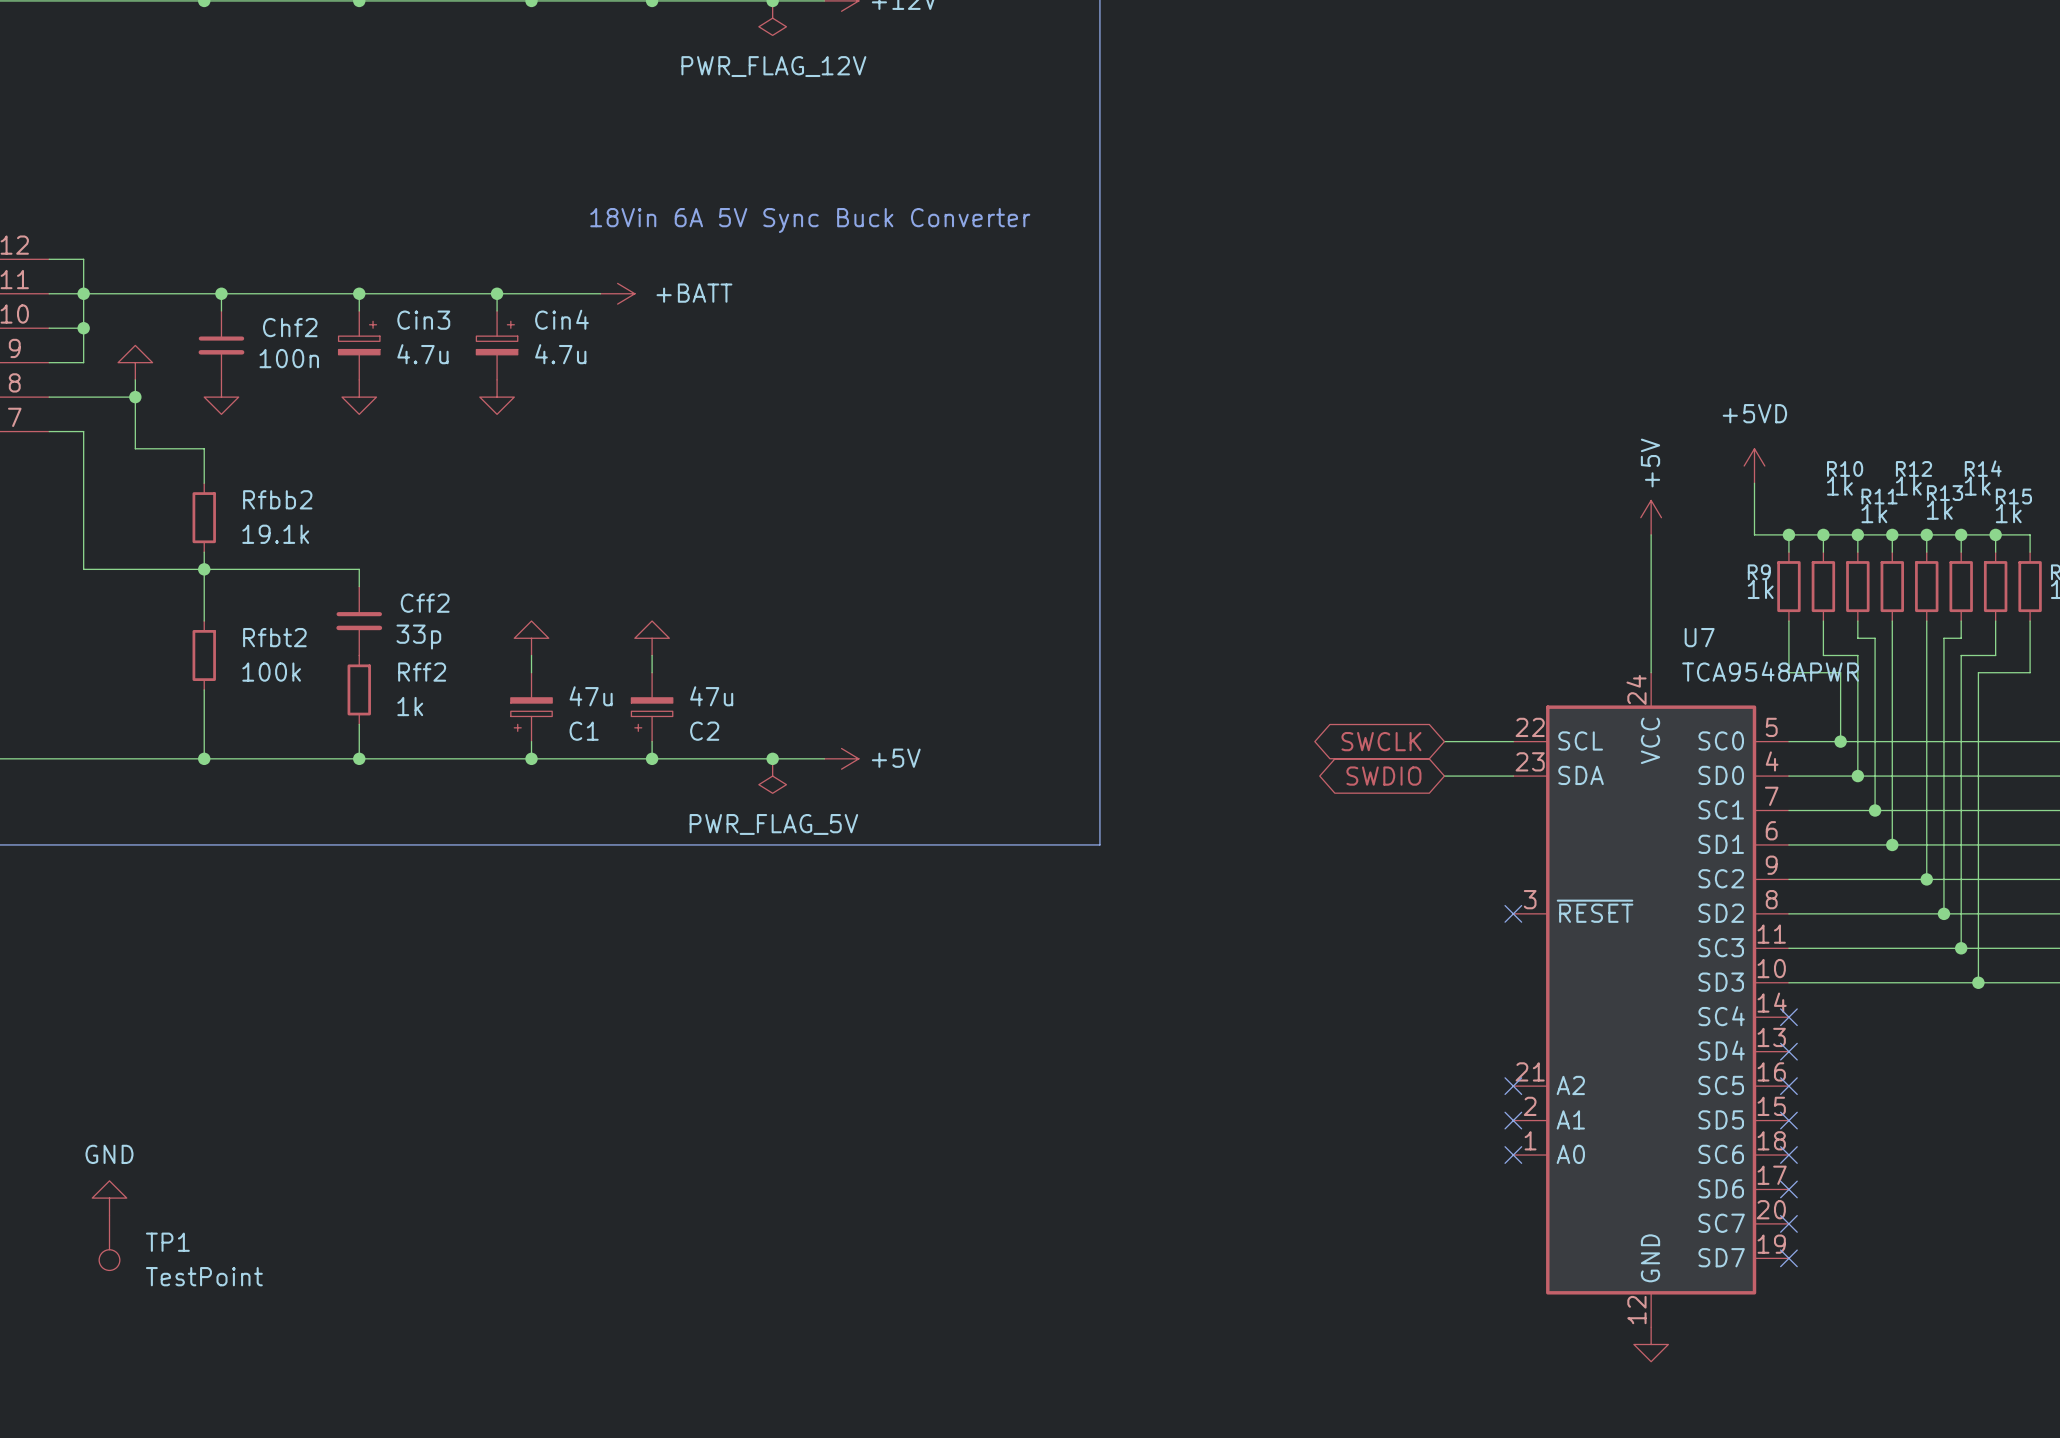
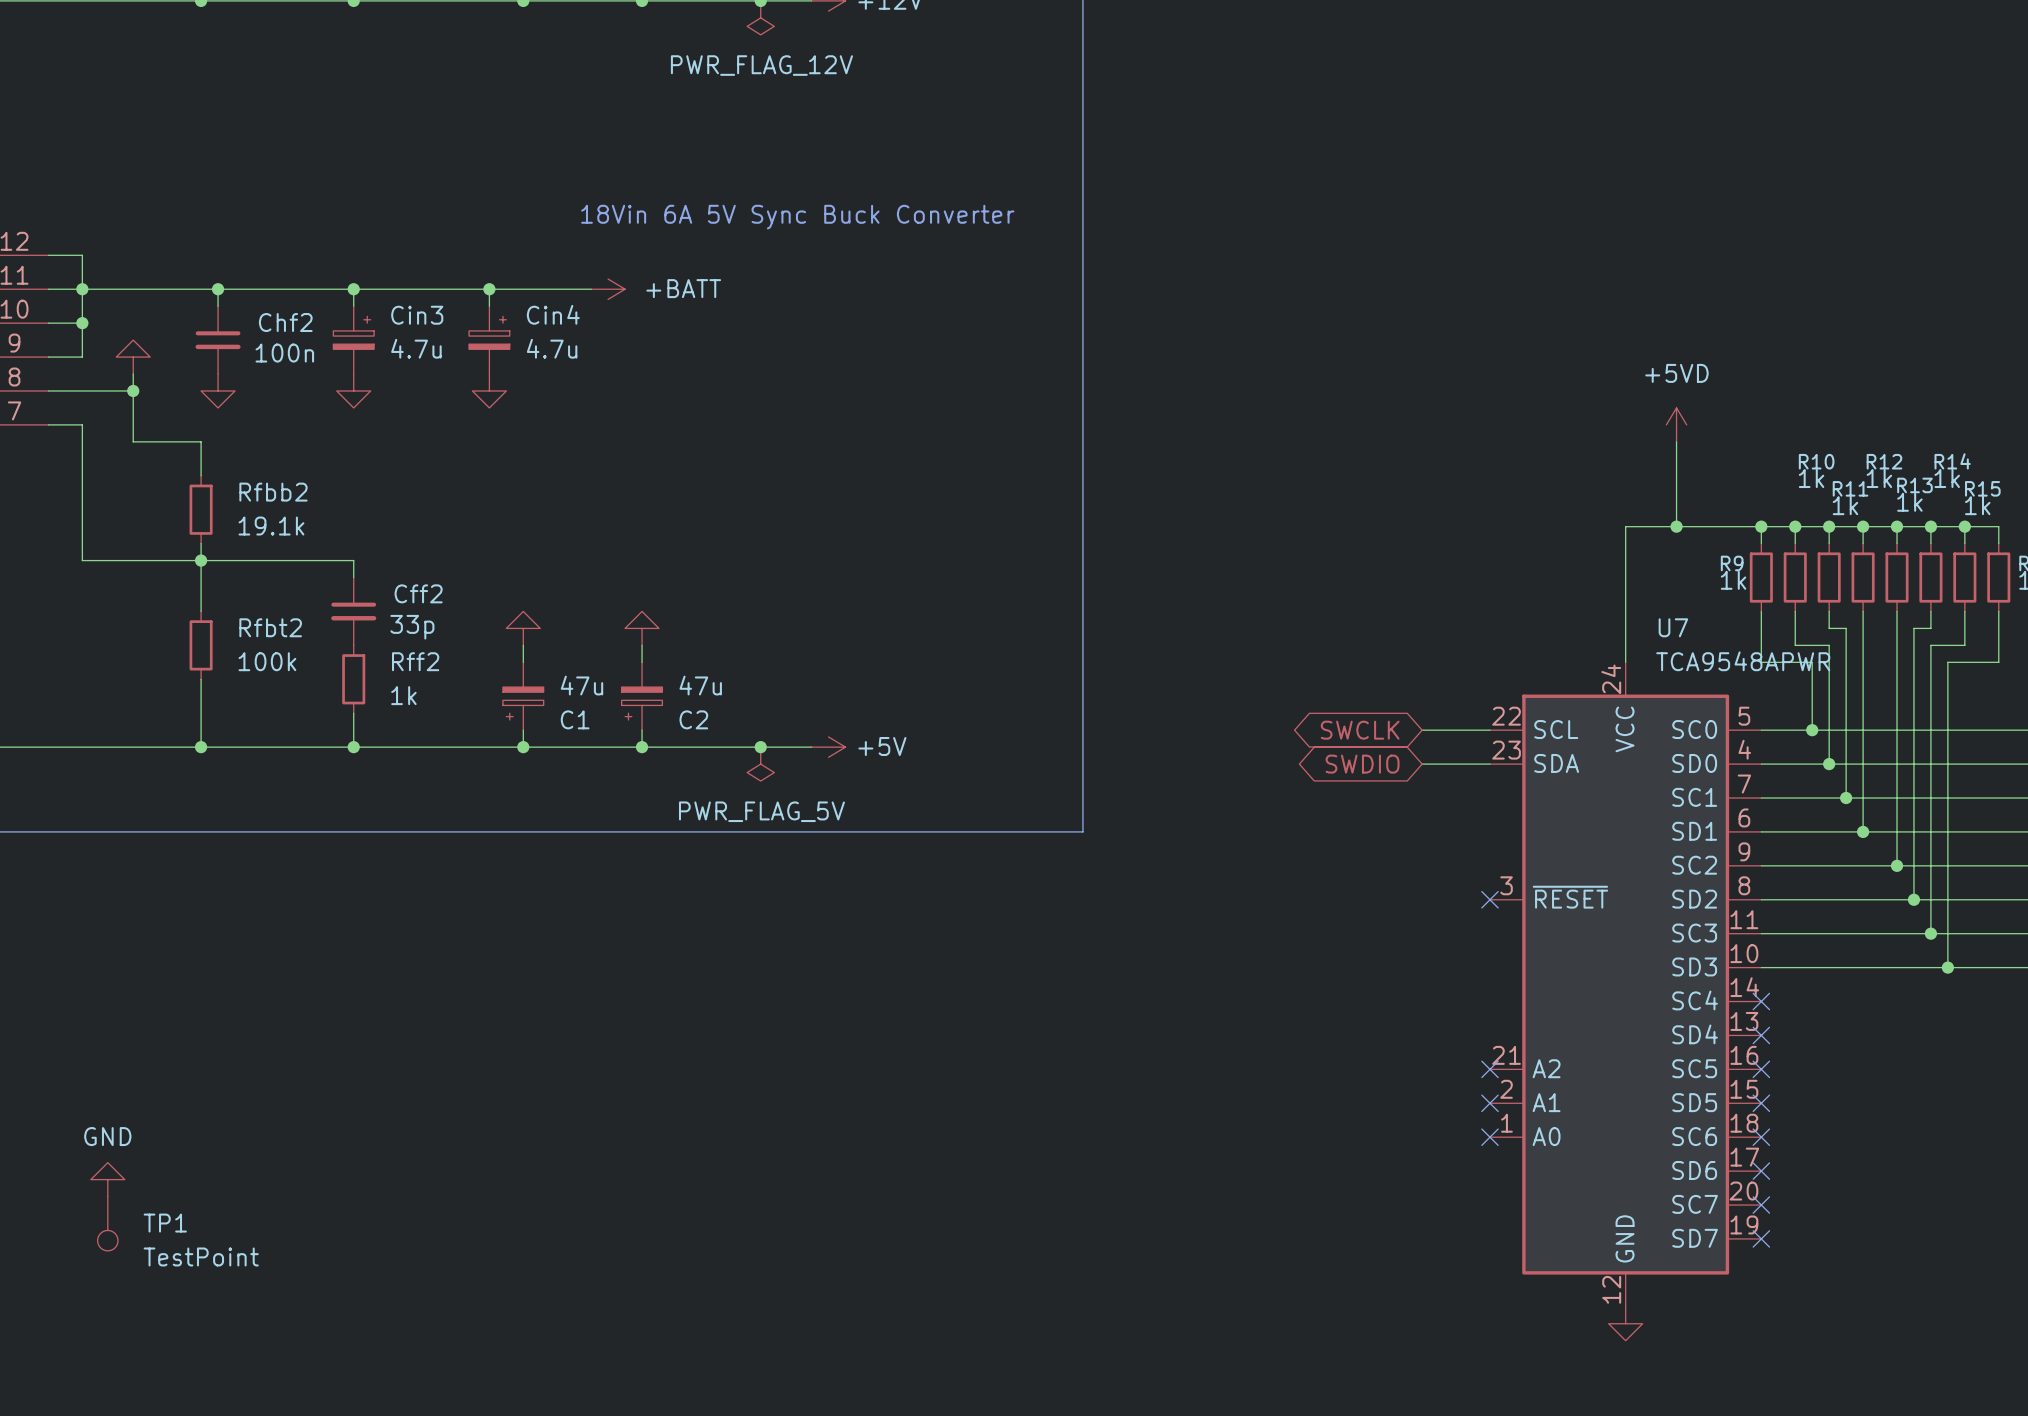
wire: none -> (1676, 441) (1676, 526)
power symbol position: +5VD (1754, 466) -> +5VD (1676, 424)
wire: (1754, 483) (1754, 534) -> (1625, 526) (1727, 526)
power symbol: +5V (1651, 517) -> none
junction: none -> (1676, 526)

